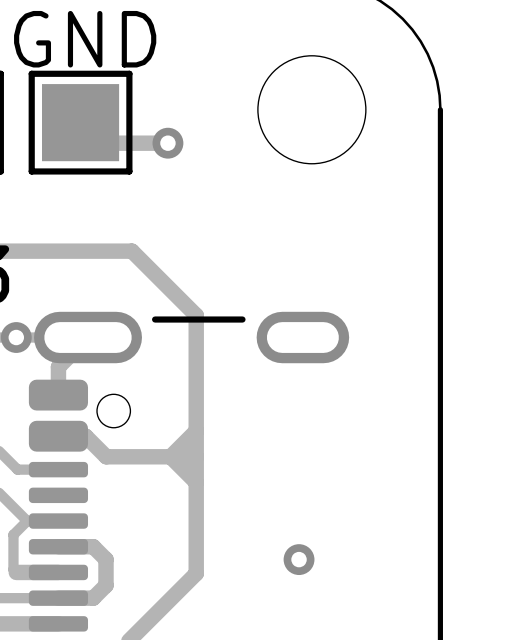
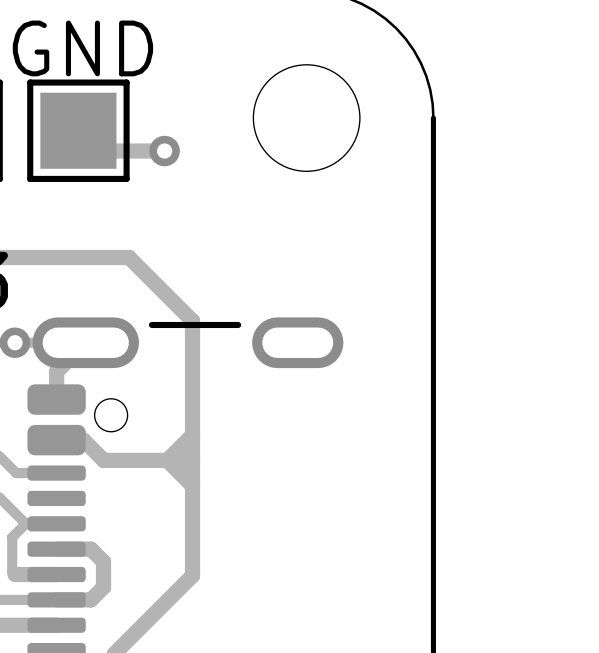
via: (299, 559) -> none

